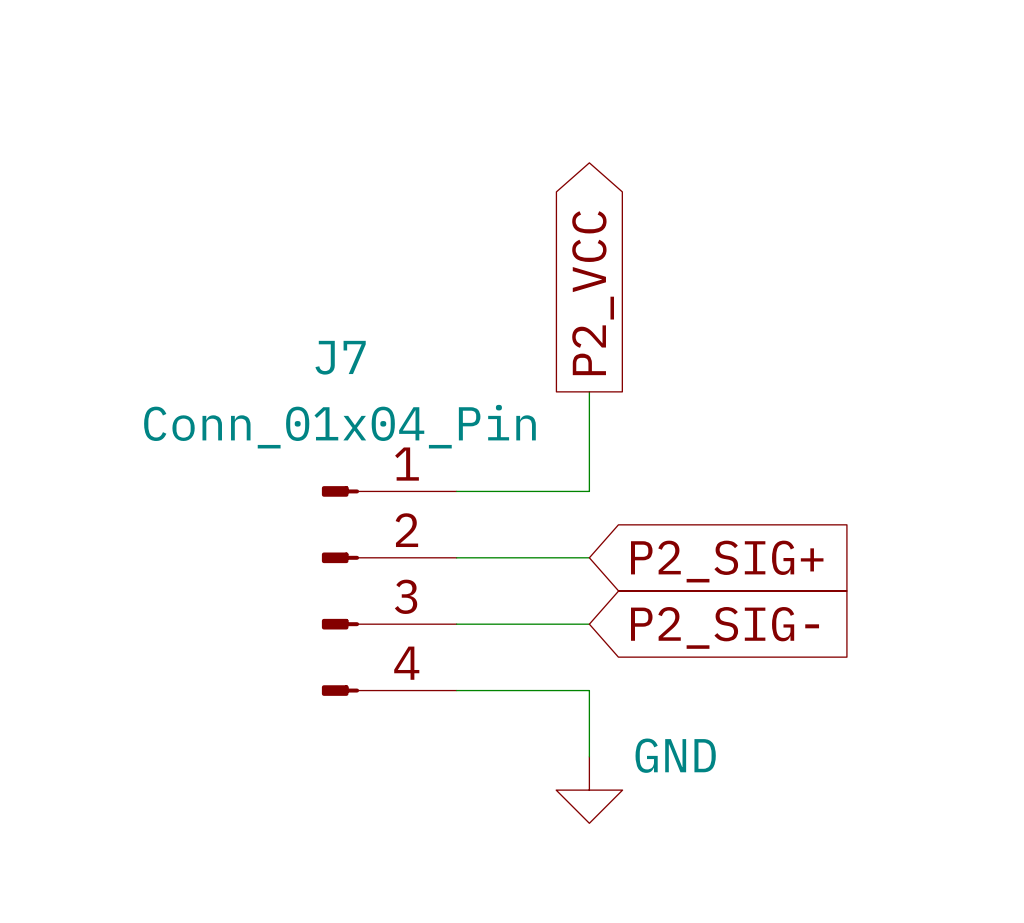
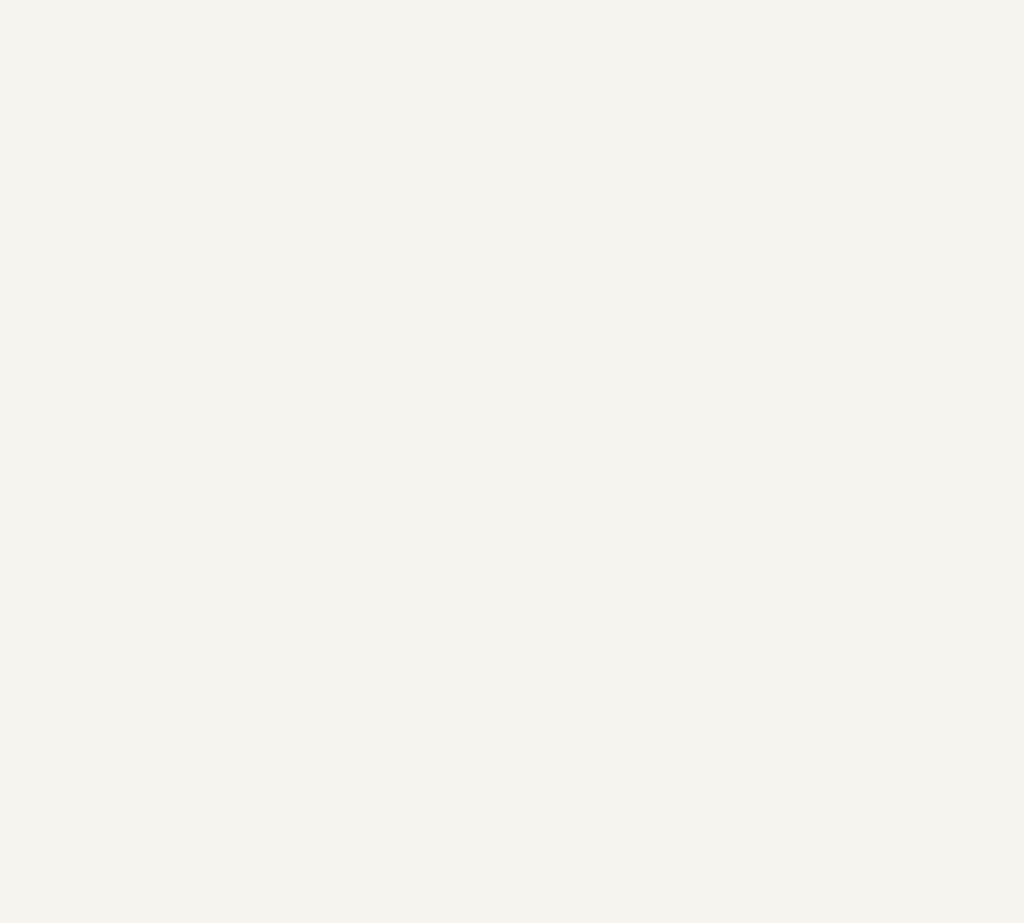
global label: P2_VCC (593, 293) -> none
wire: (589, 391) (589, 491) (456, 491) -> none
wire: (456, 557) (589, 557) -> none
global label: P2_SIG+ (727, 561) -> none
J7: Conn_01x04_Pin (389, 590) -> none
wire: (456, 624) (589, 624) -> none
global label: P2_SIG- (725, 627) -> none
wire: (456, 690) (589, 690) (589, 756) -> none
power symbol: GND (589, 790) -> none

